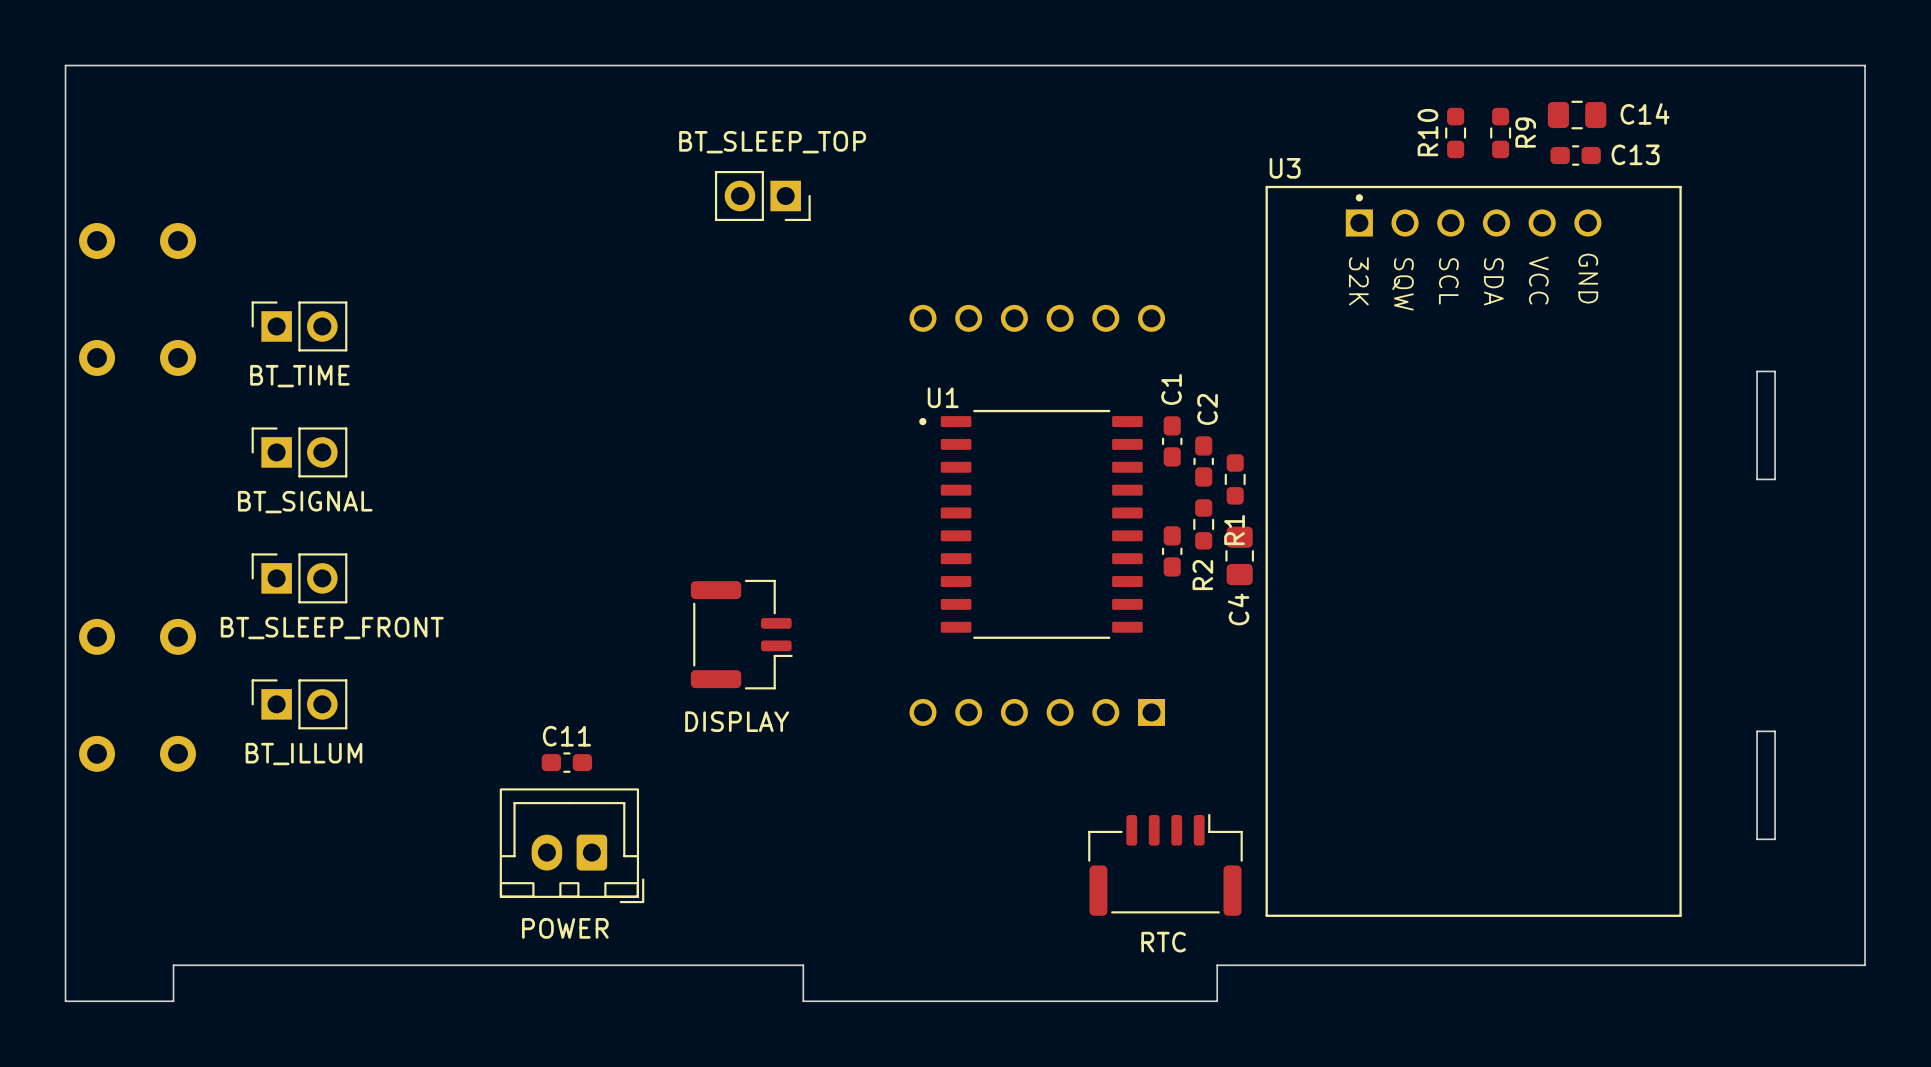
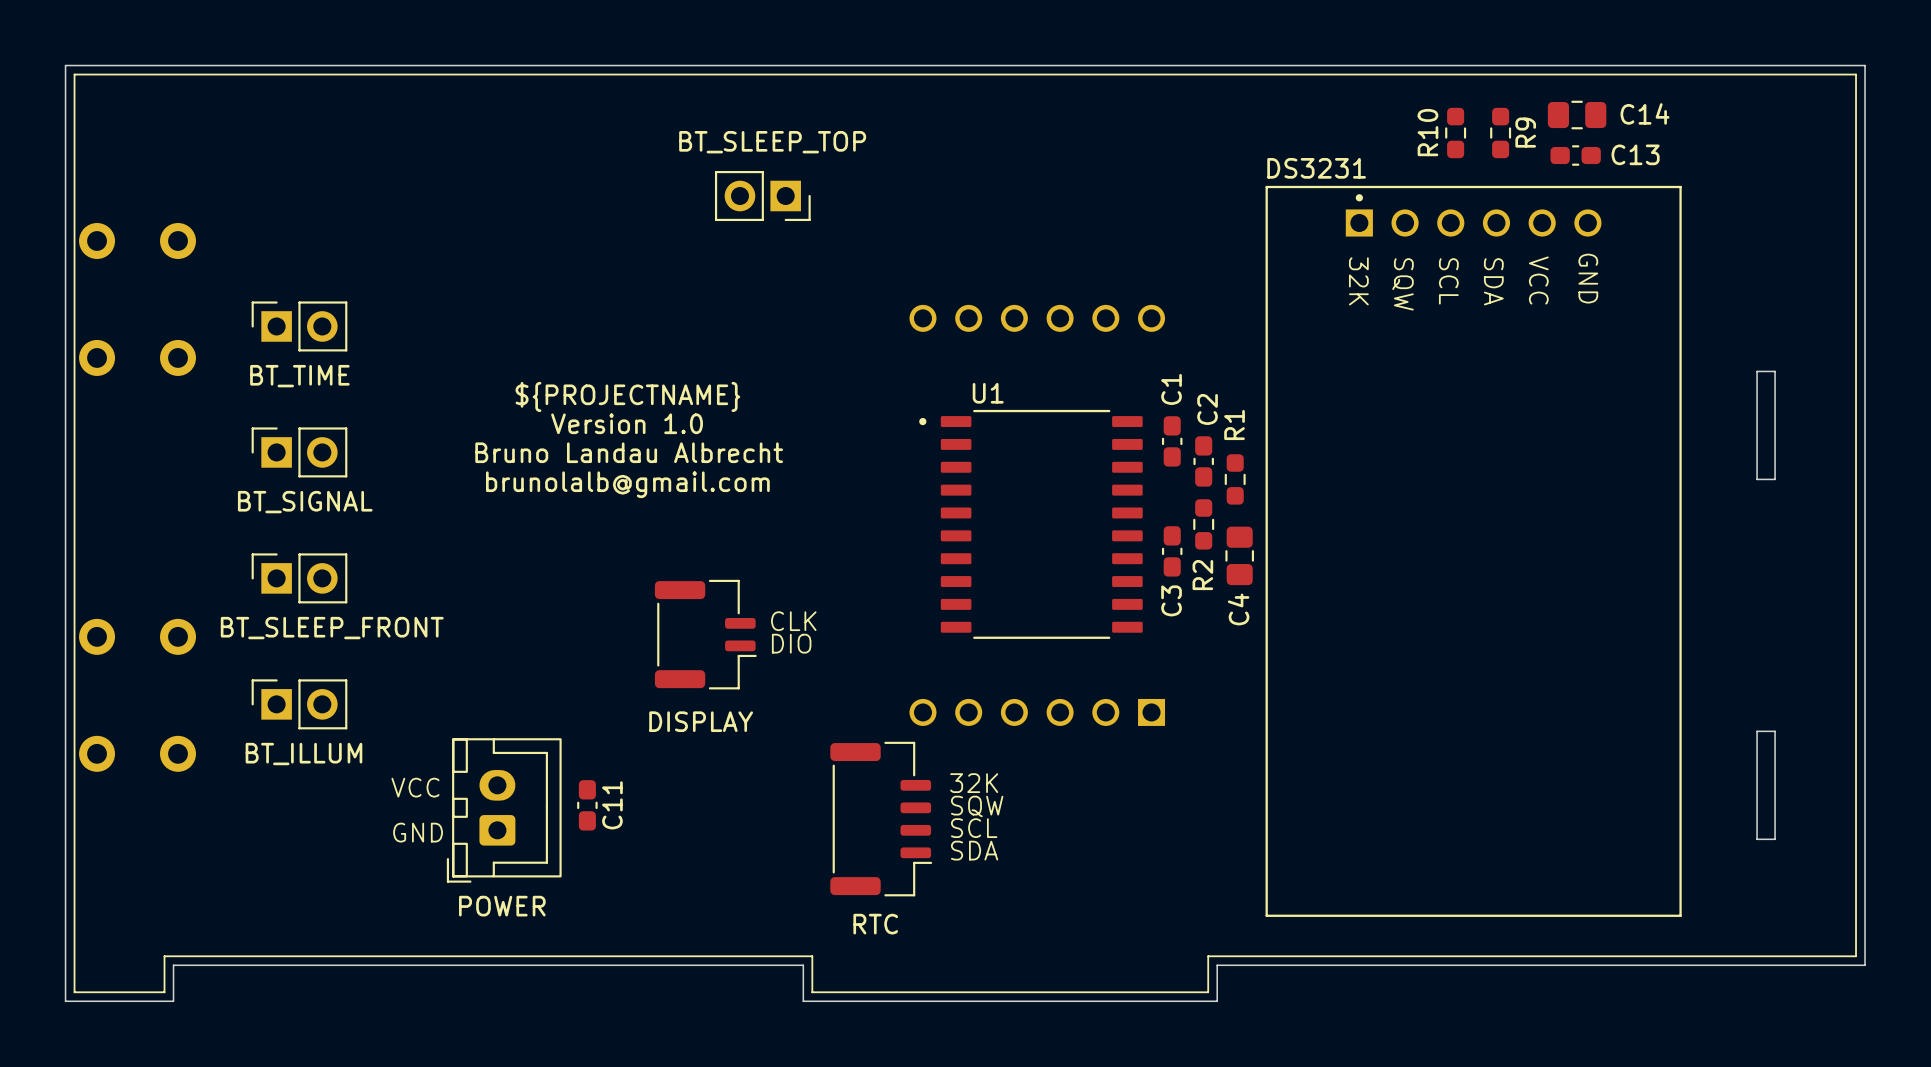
line: none -> (74, 74) (1856, 74) (1856, 956) (1208, 956) (1208, 992) (812, 992) (812, 956) (164, 956) (164, 992) (74, 992) (74, 74)
U3 name: U3 (1285, 168) -> none
U3 value: none -> DS3231 (1316, 168)
text: none -> ${PROJECTNAME} (627, 396)
U1 name position: U1 (943, 397) -> U1 (988, 393)
text: none -> Version 1.0 (627, 423)
text: none -> Bruno Landau Albrecht (629, 452)
text: none -> brunolalb@gmail.com (627, 484)
R1 name position: R1 (1234, 530) -> R1 (1234, 425)
C3 name: none -> C3 (1171, 600)
text: none -> CLK (793, 621)
part position: (741, 634) -> (705, 634)
text: none -> DIO (791, 643)
C11 rotation: 0° (566, 762) -> 90° clockwise (587, 805)
C11 position: (566, 762) -> (587, 805)
text: none -> 32K (974, 783)
text: none -> VCC (415, 787)
text: none -> SQW (977, 806)
text: none -> SCL (974, 828)
text: none -> GND (418, 832)
part rotation: 0° (572, 845) -> 90° clockwise (504, 810)
text: none -> SDA (974, 850)
part rotation: 0° (1165, 864) -> 90° clockwise (881, 819)
part position: (1165, 864) -> (881, 819)

